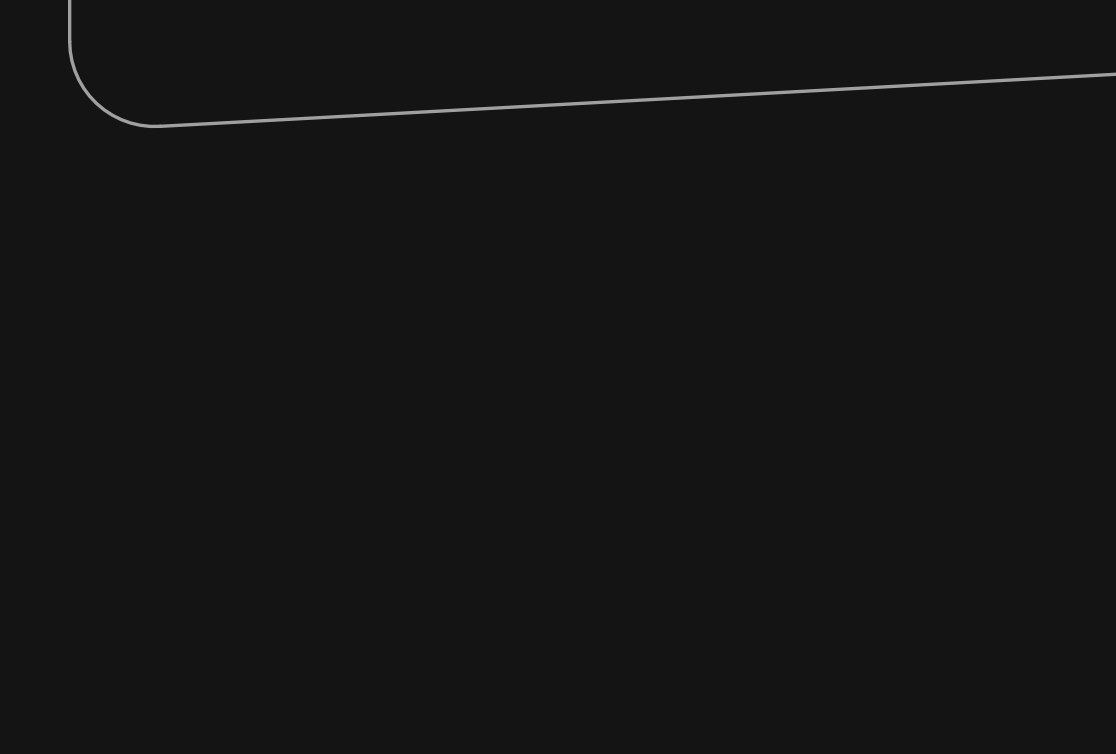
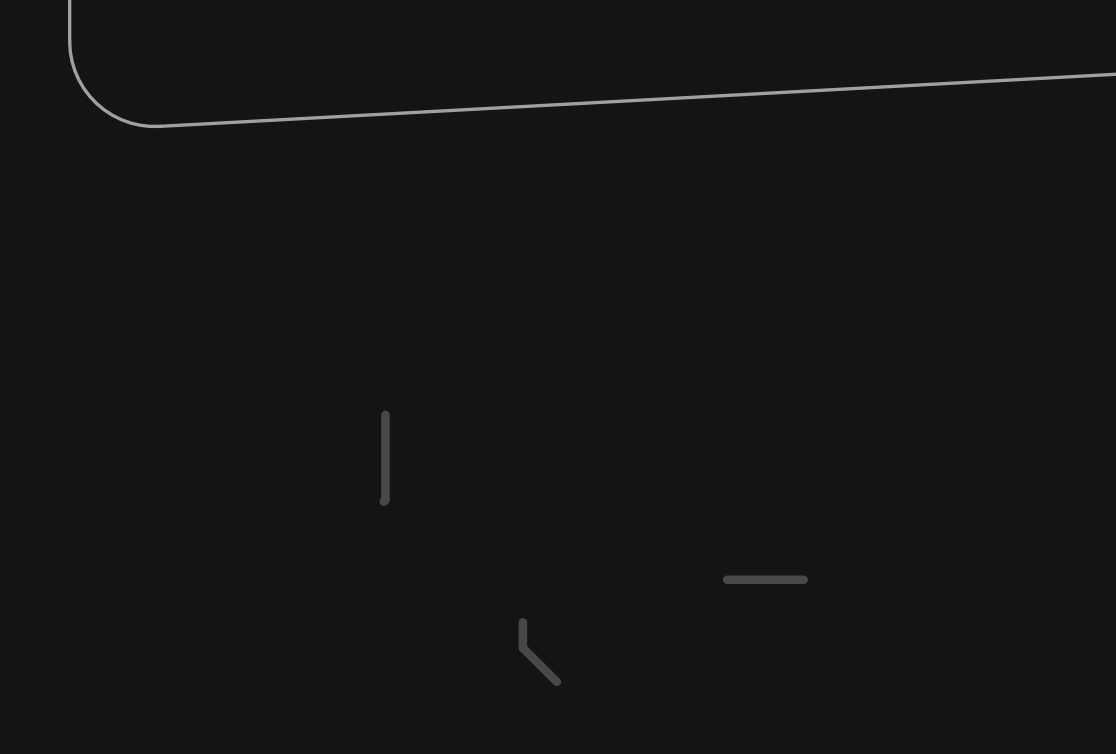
track: none -> (385, 414) (385, 499) (383, 501)
track: none -> (803, 579) (727, 579)
track: none -> (522, 622) (522, 647) (556, 681)

